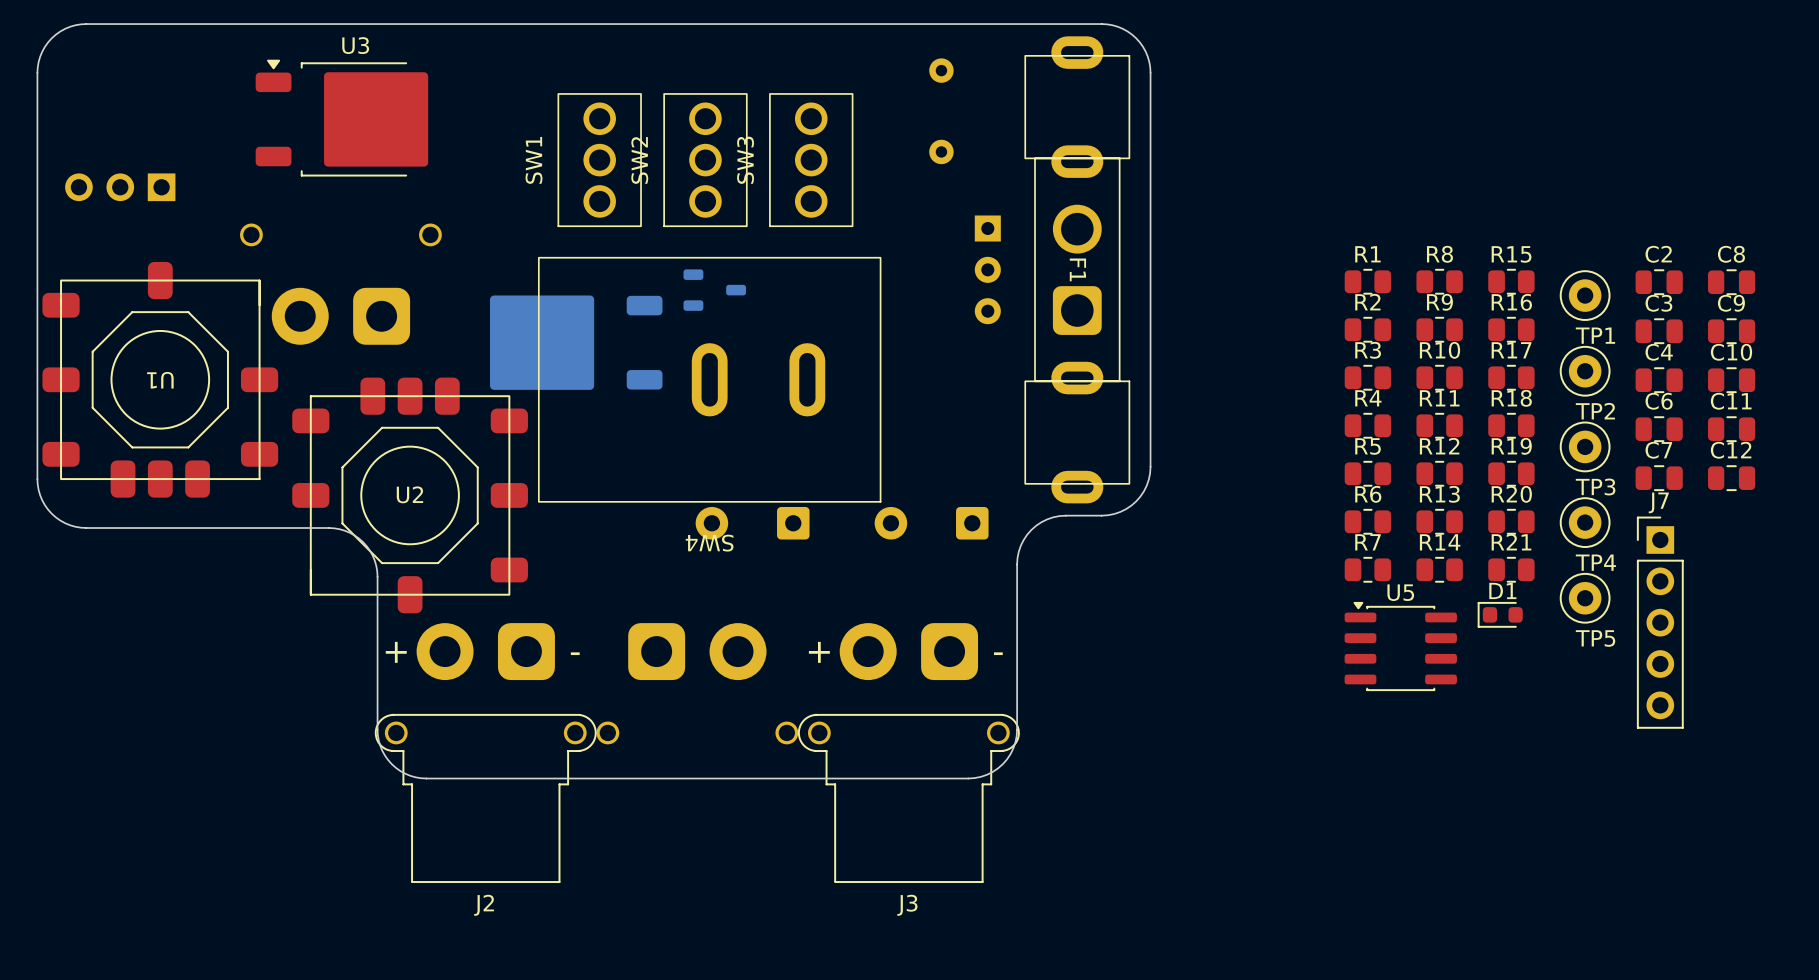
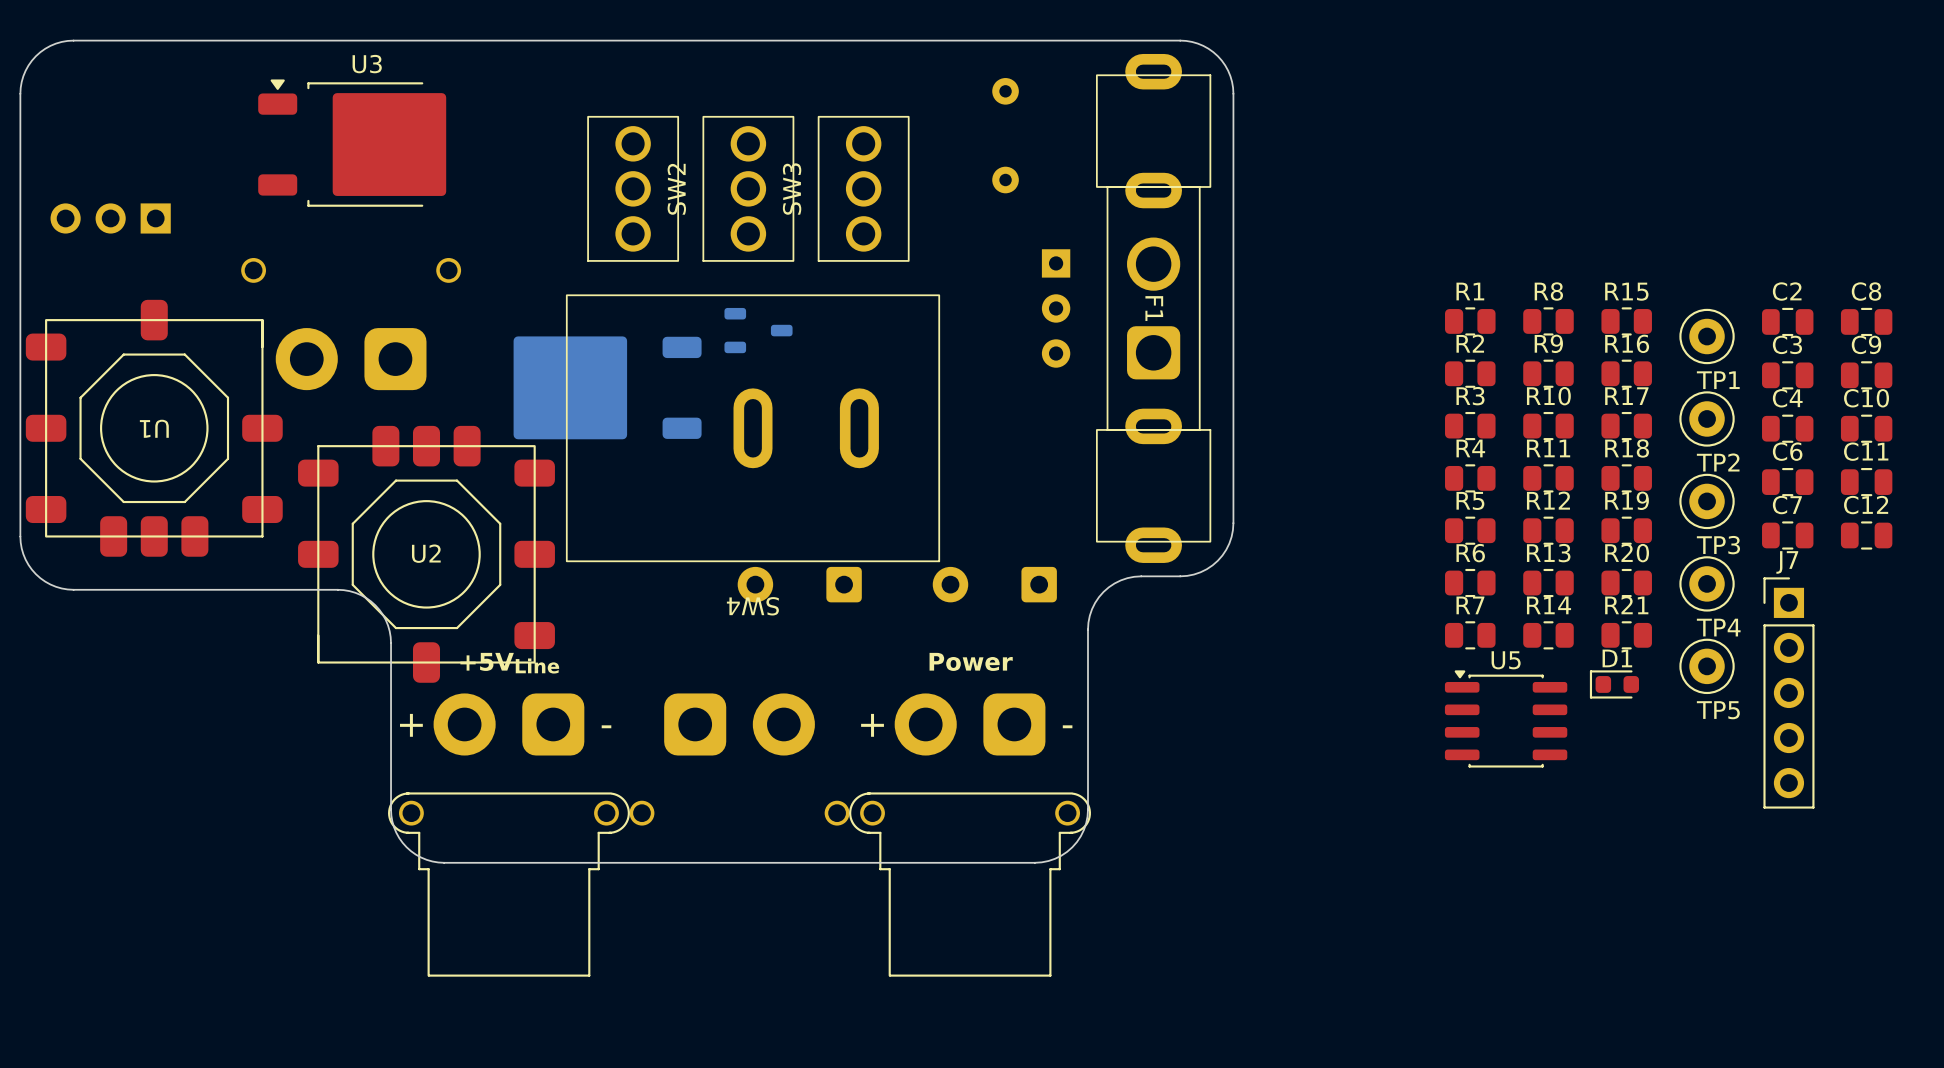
SW1 name: SW1 (534, 160) -> none
J3 value: none -> Power (971, 661)
J2 value: none -> +5VLine (509, 663)
J2 name: J2 (484, 905) -> none
J3 name: J3 (907, 905) -> none

